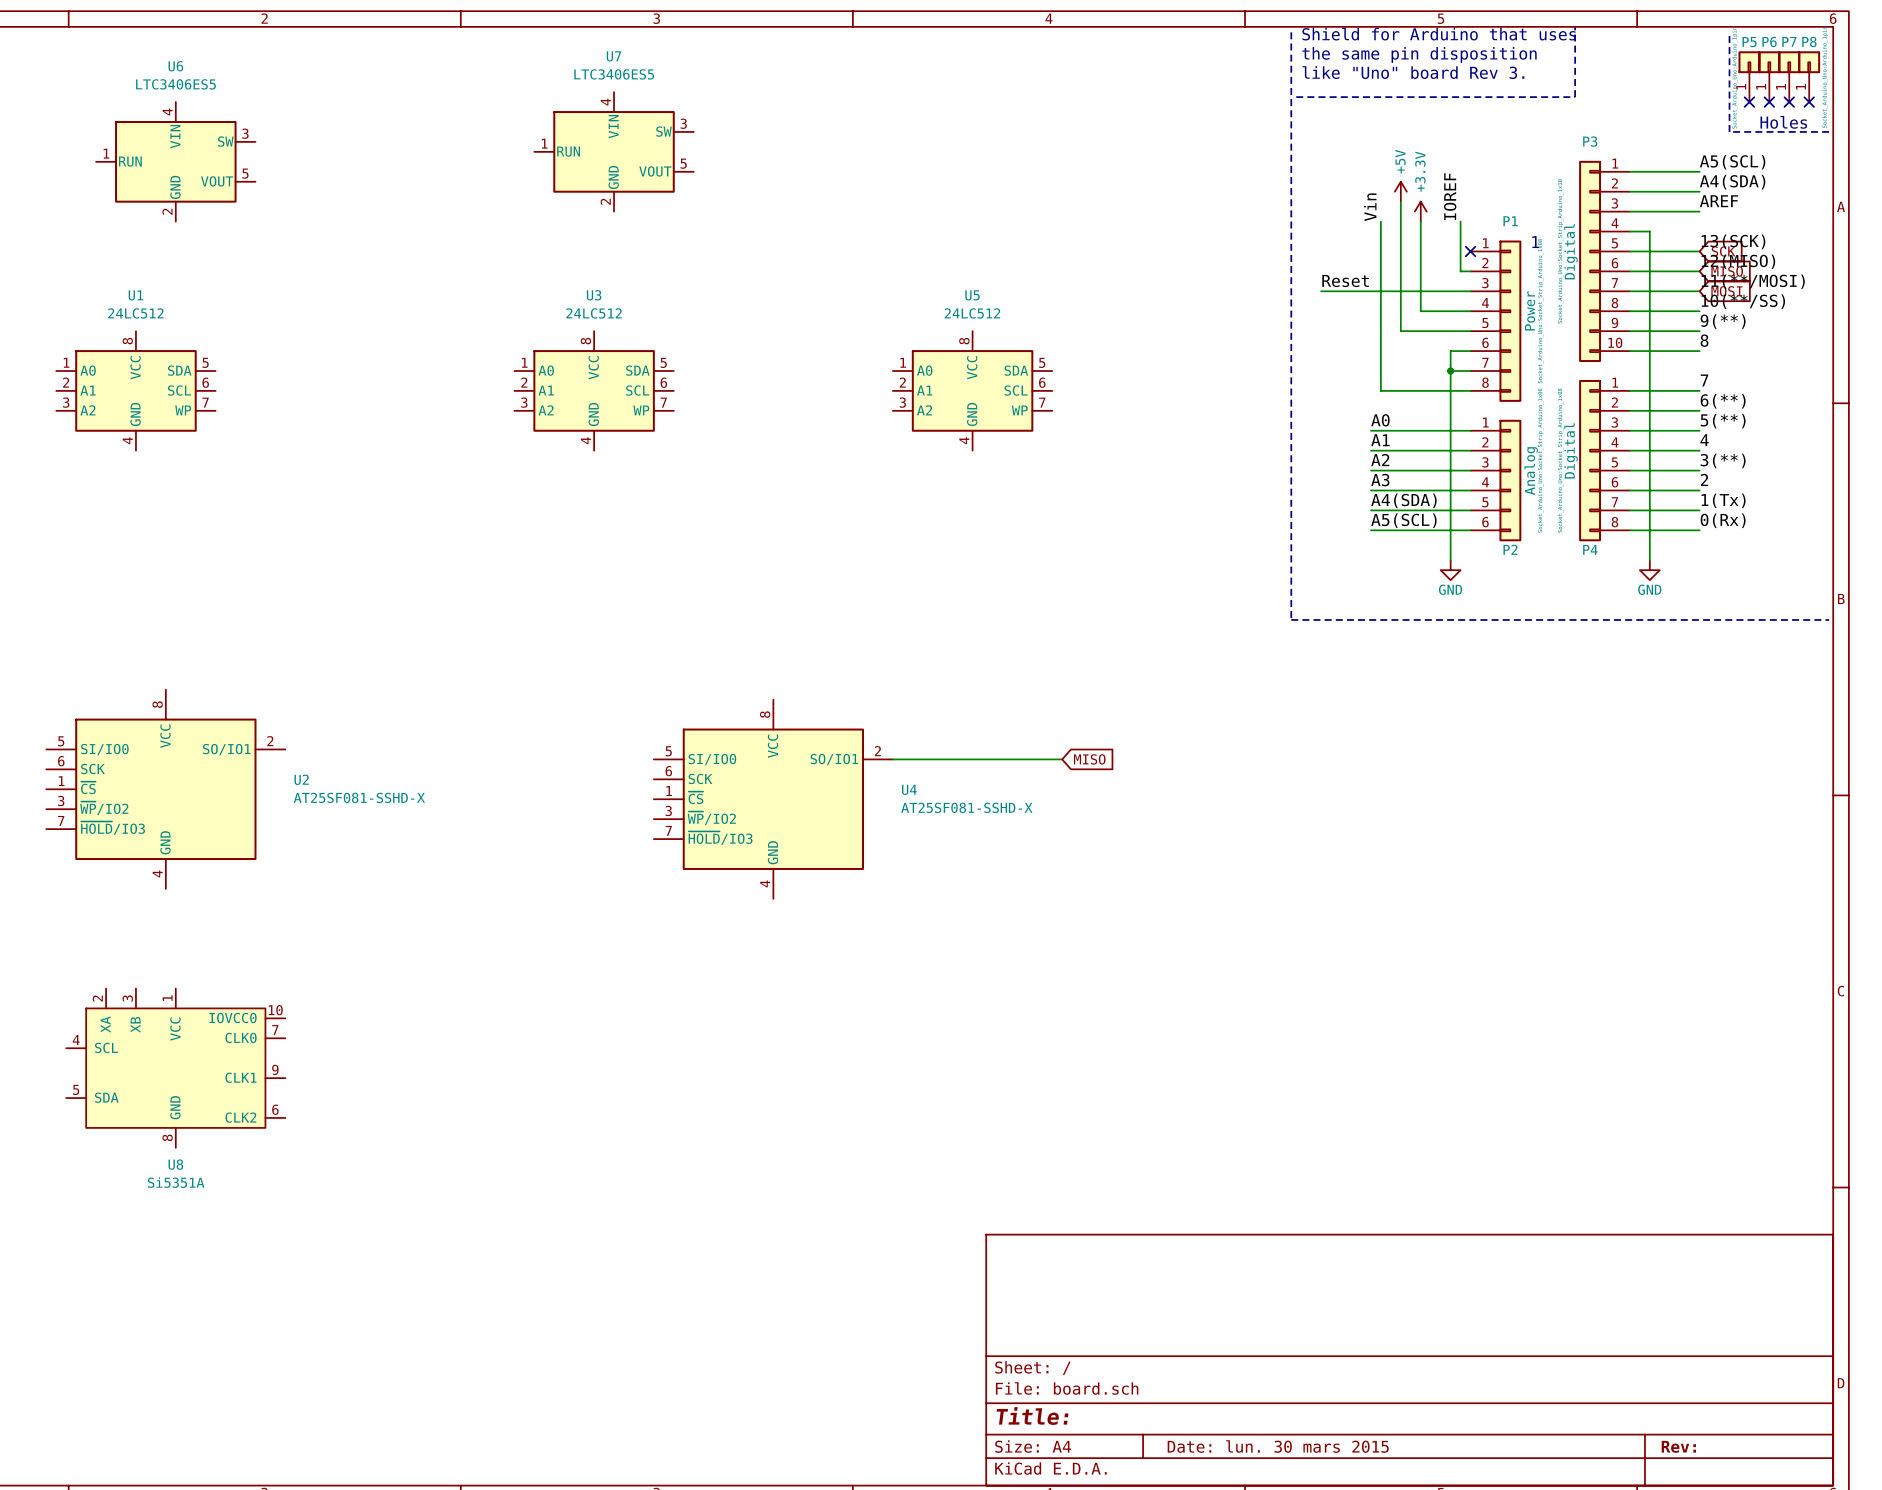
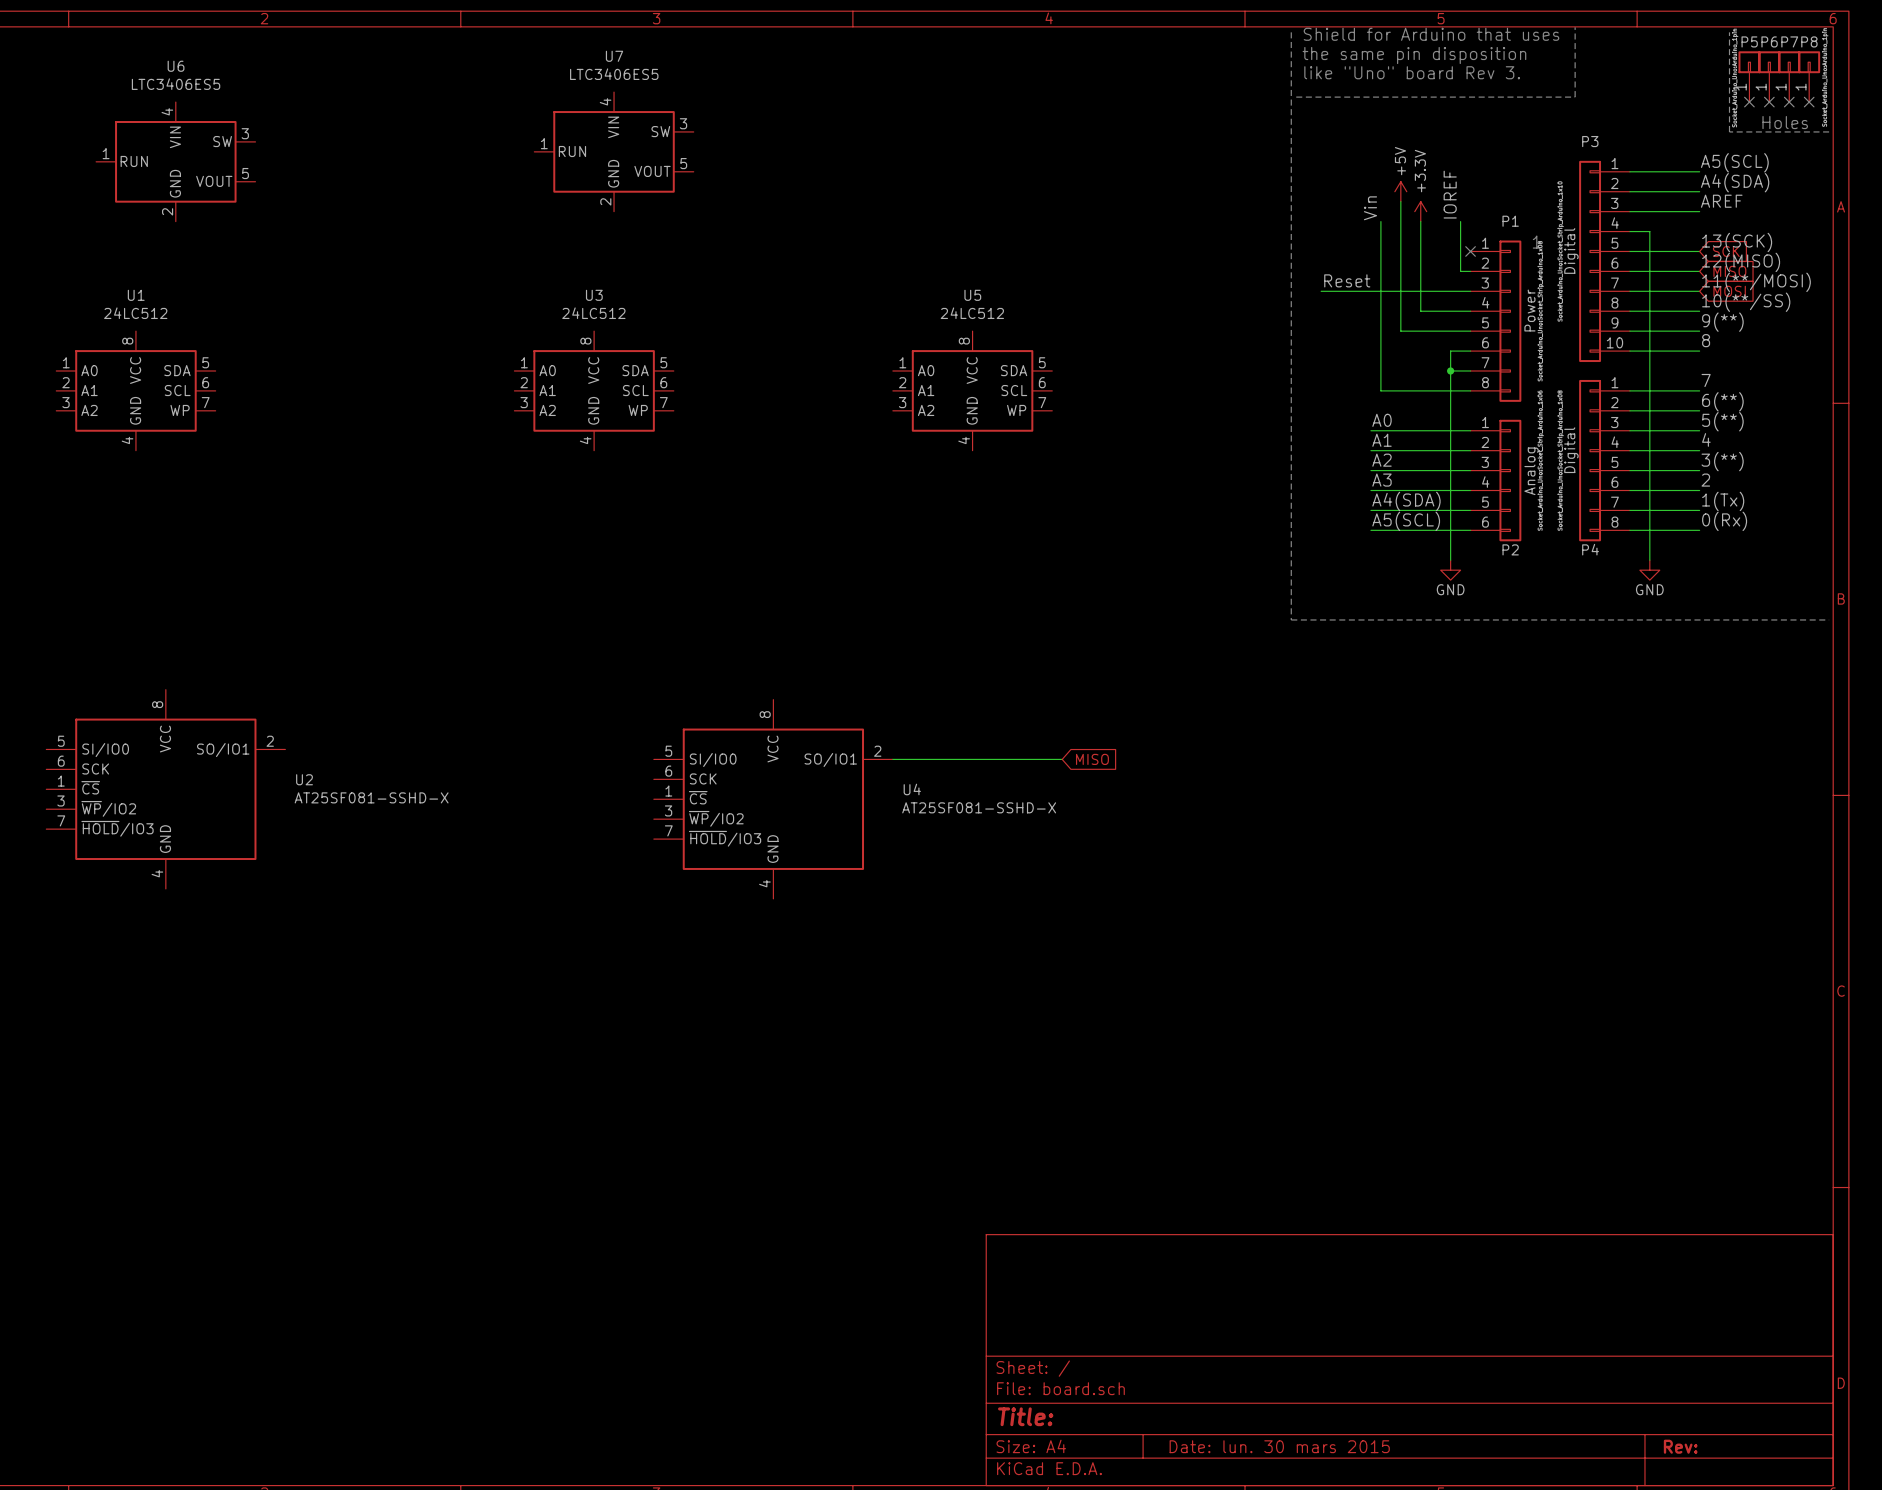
U8: Si5351A (175, 1068) -> none

